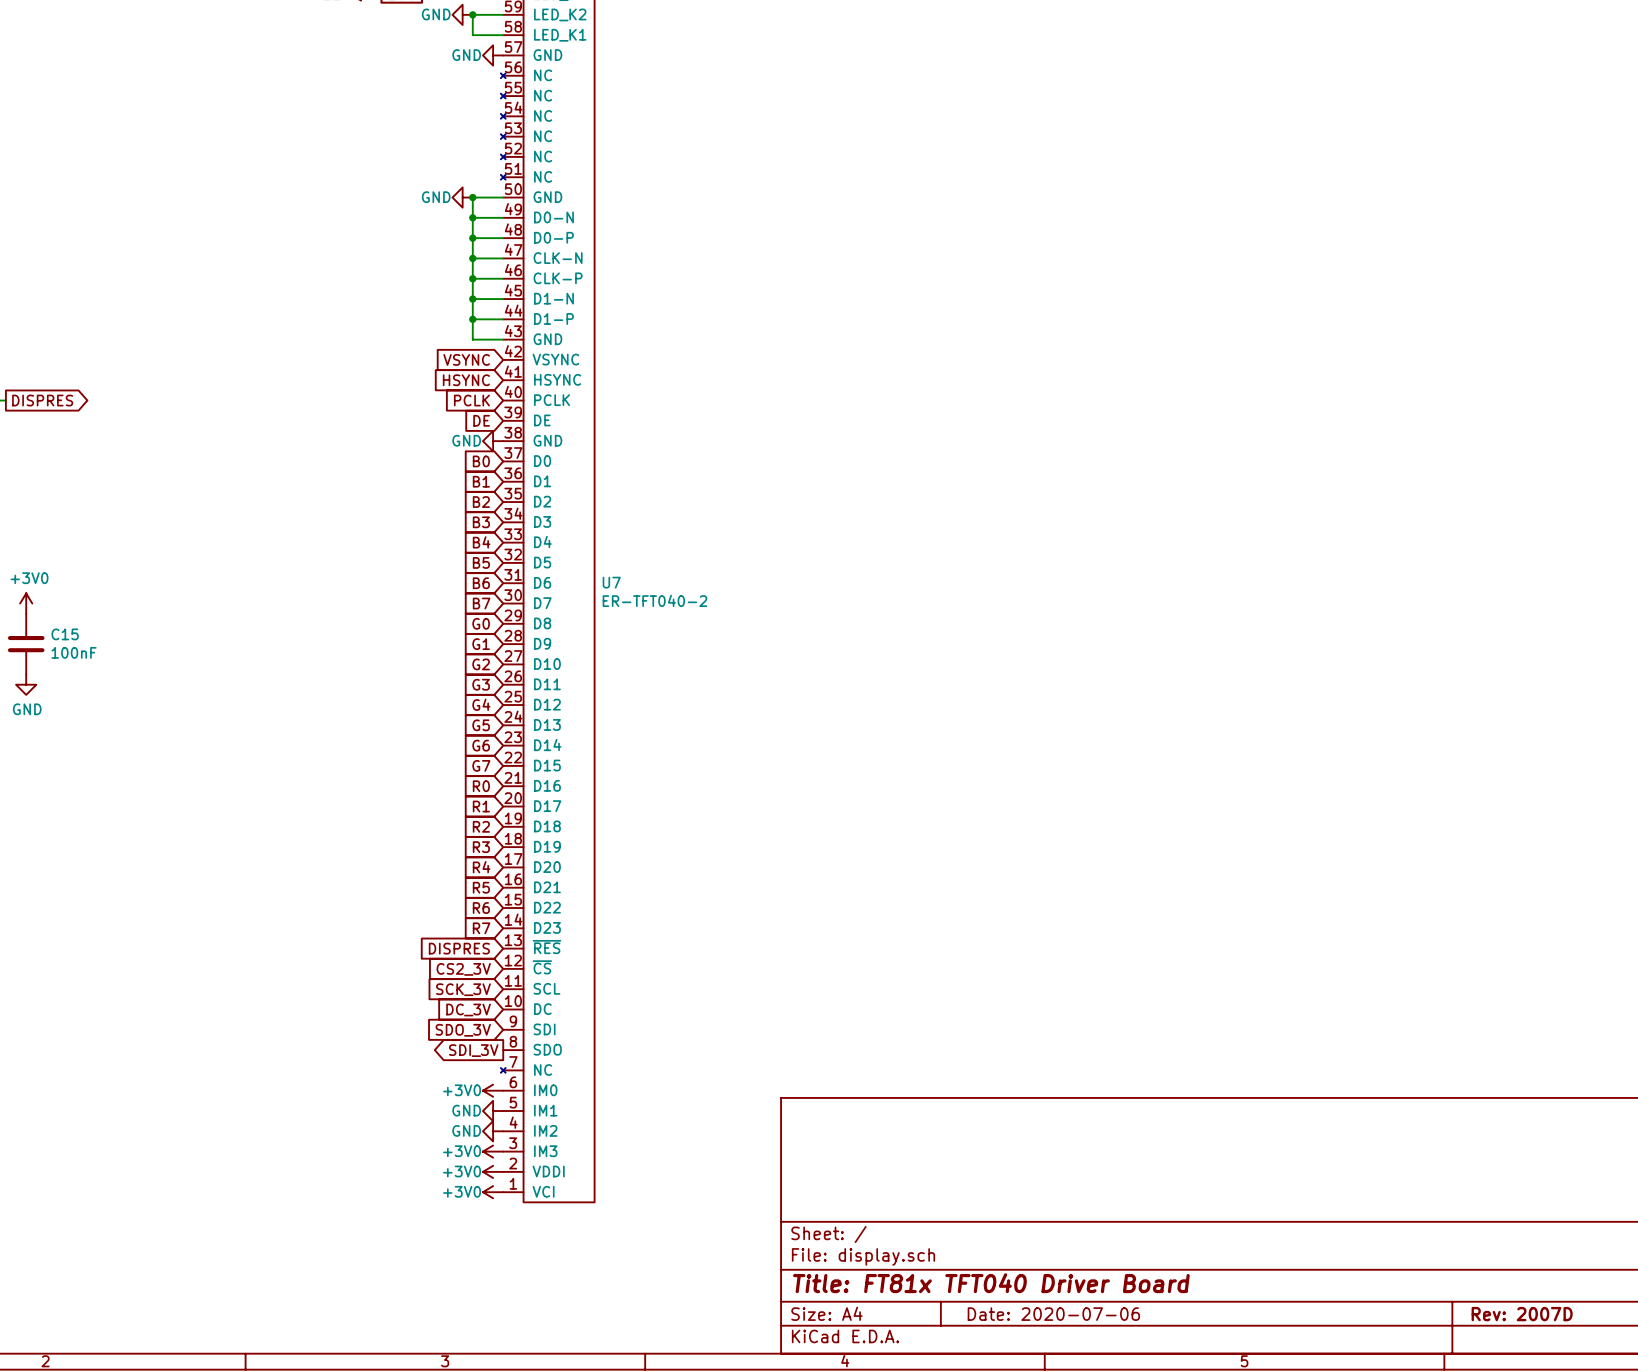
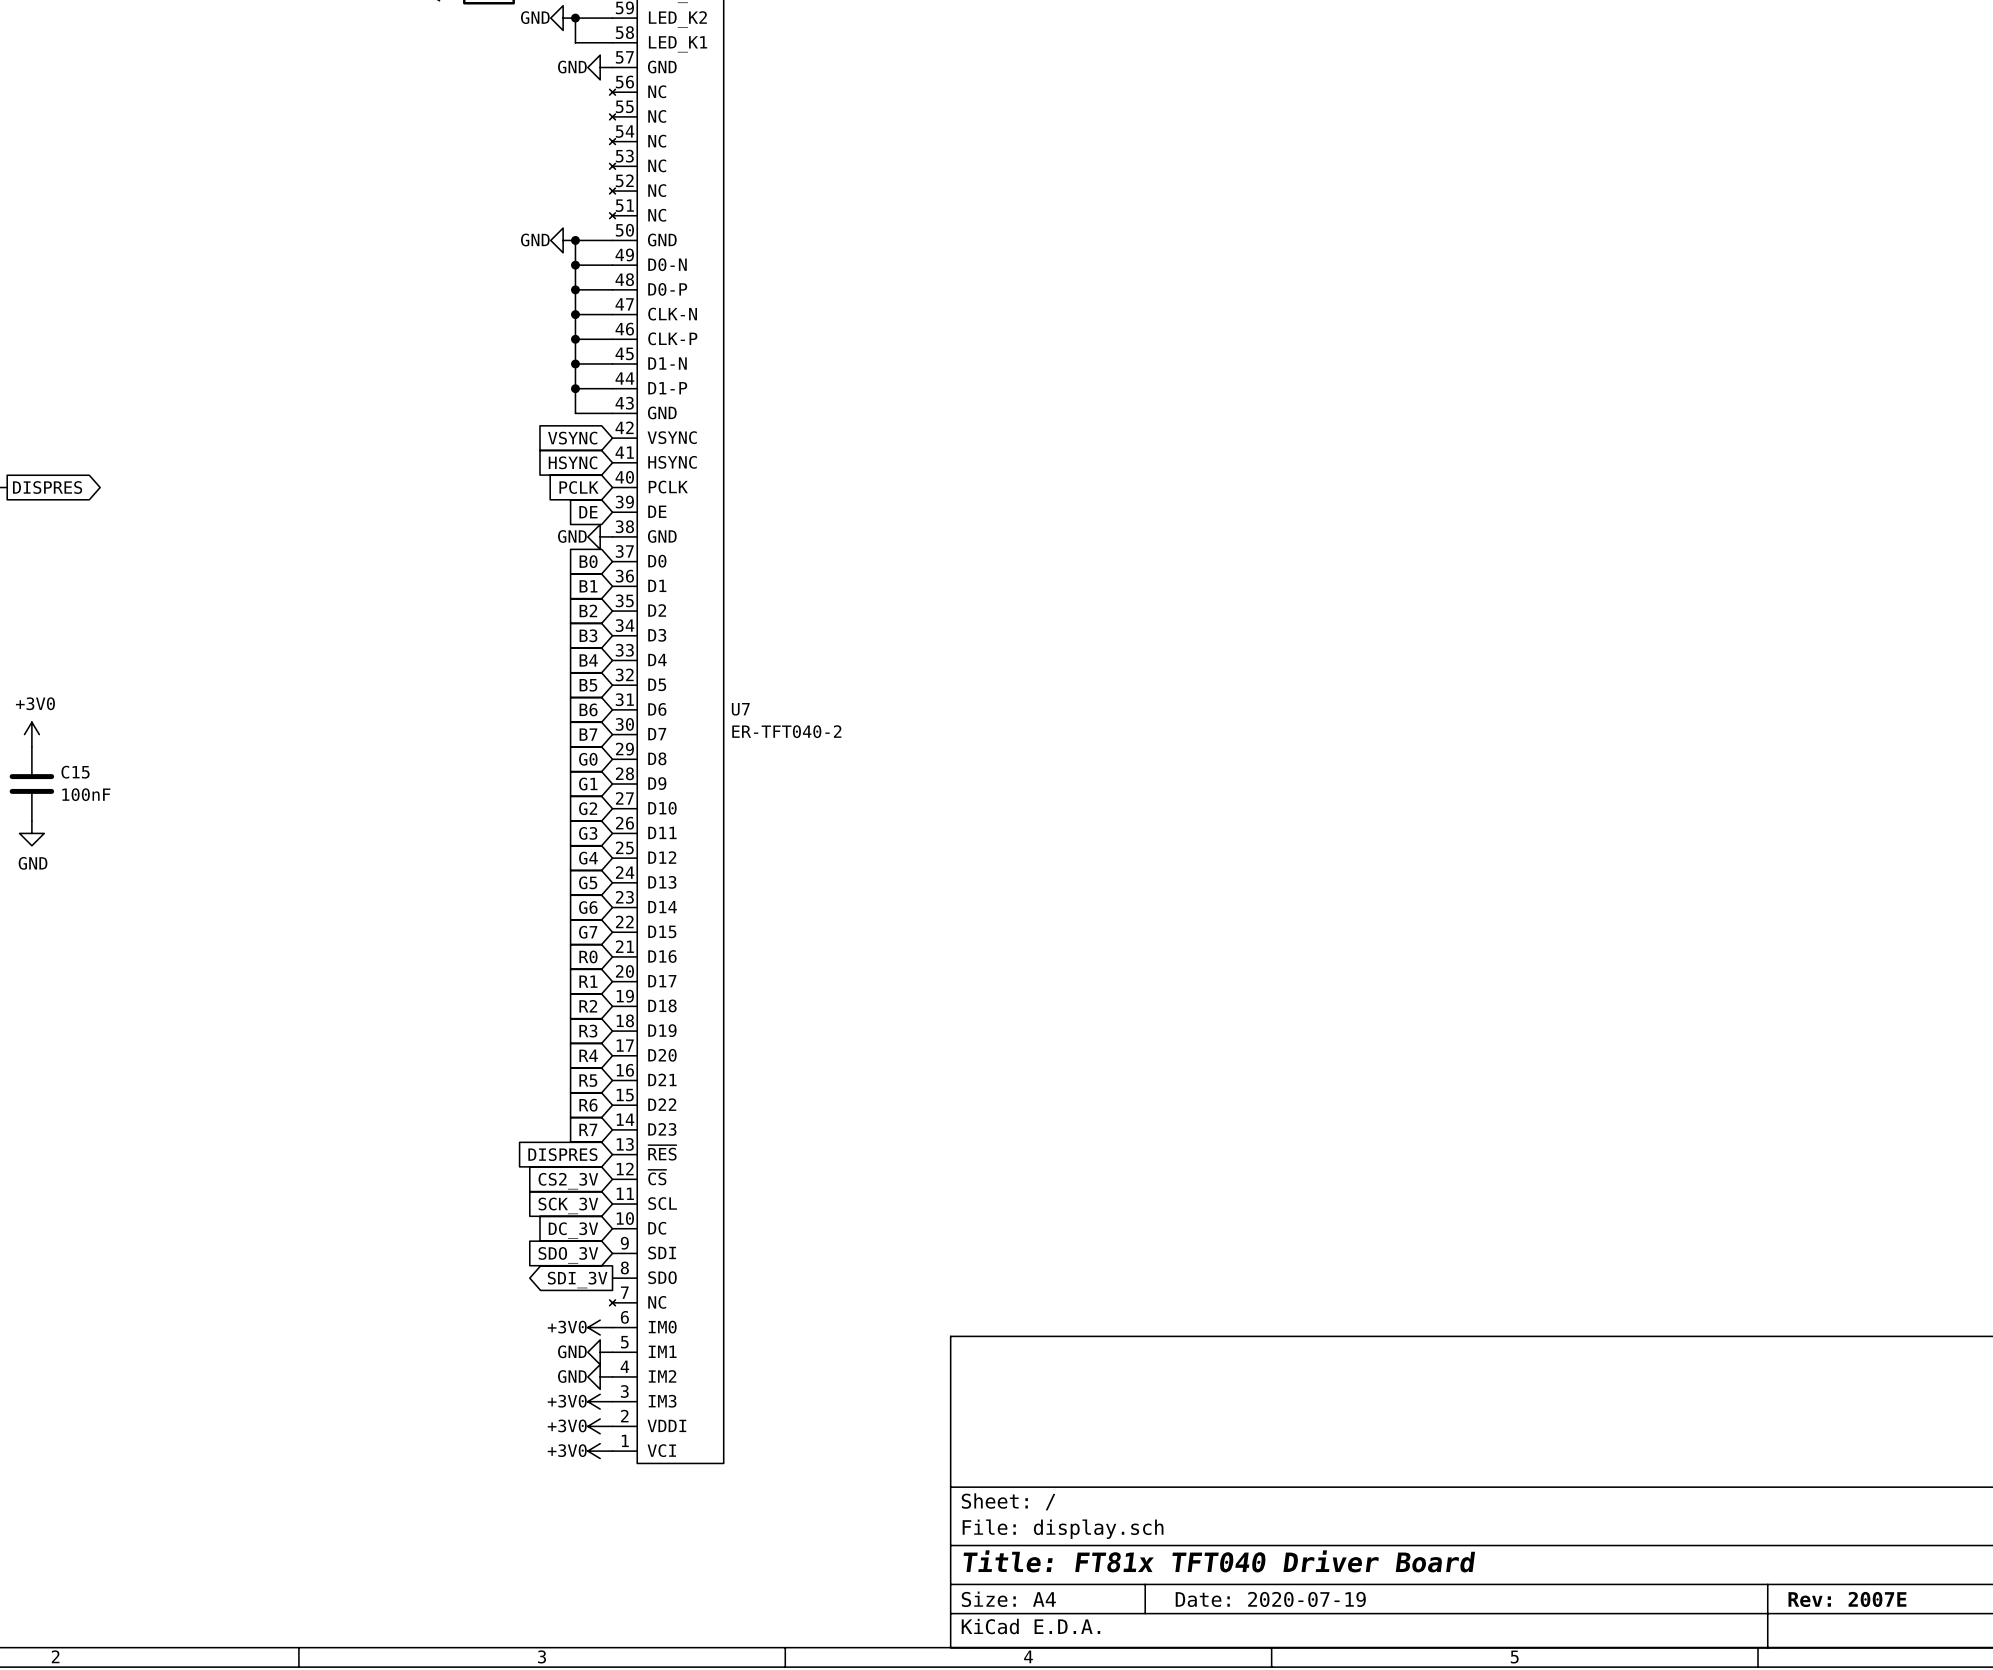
title block: Date: 2020-07-06 (1053, 1314) -> Date: 2020-07-19 (1270, 1599)
title block: Rev: 2007D (1522, 1314) -> Rev: 2007E (1847, 1599)

